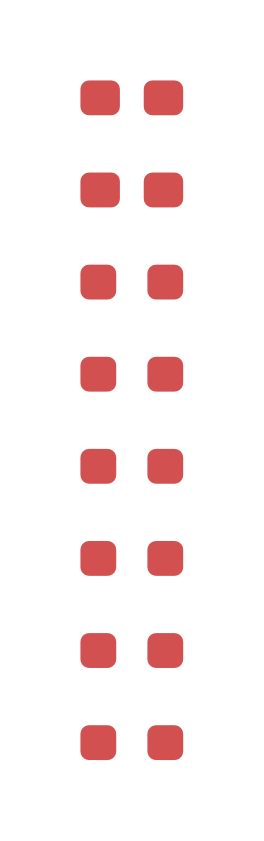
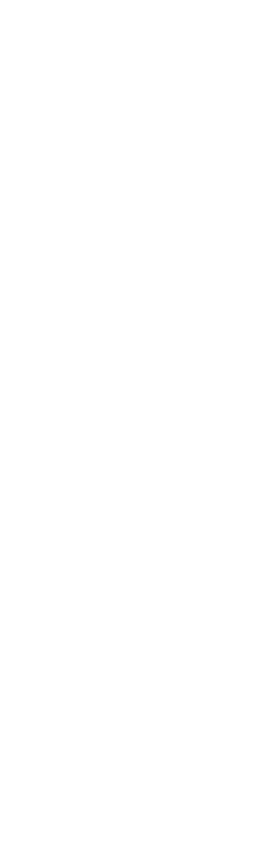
part: (131, 97) -> none
part: (131, 189) -> none
part: (131, 282) -> none
part: (131, 374) -> none
part: (131, 466) -> none
part: (131, 558) -> none
part: (131, 650) -> none
part: (131, 742) -> none

